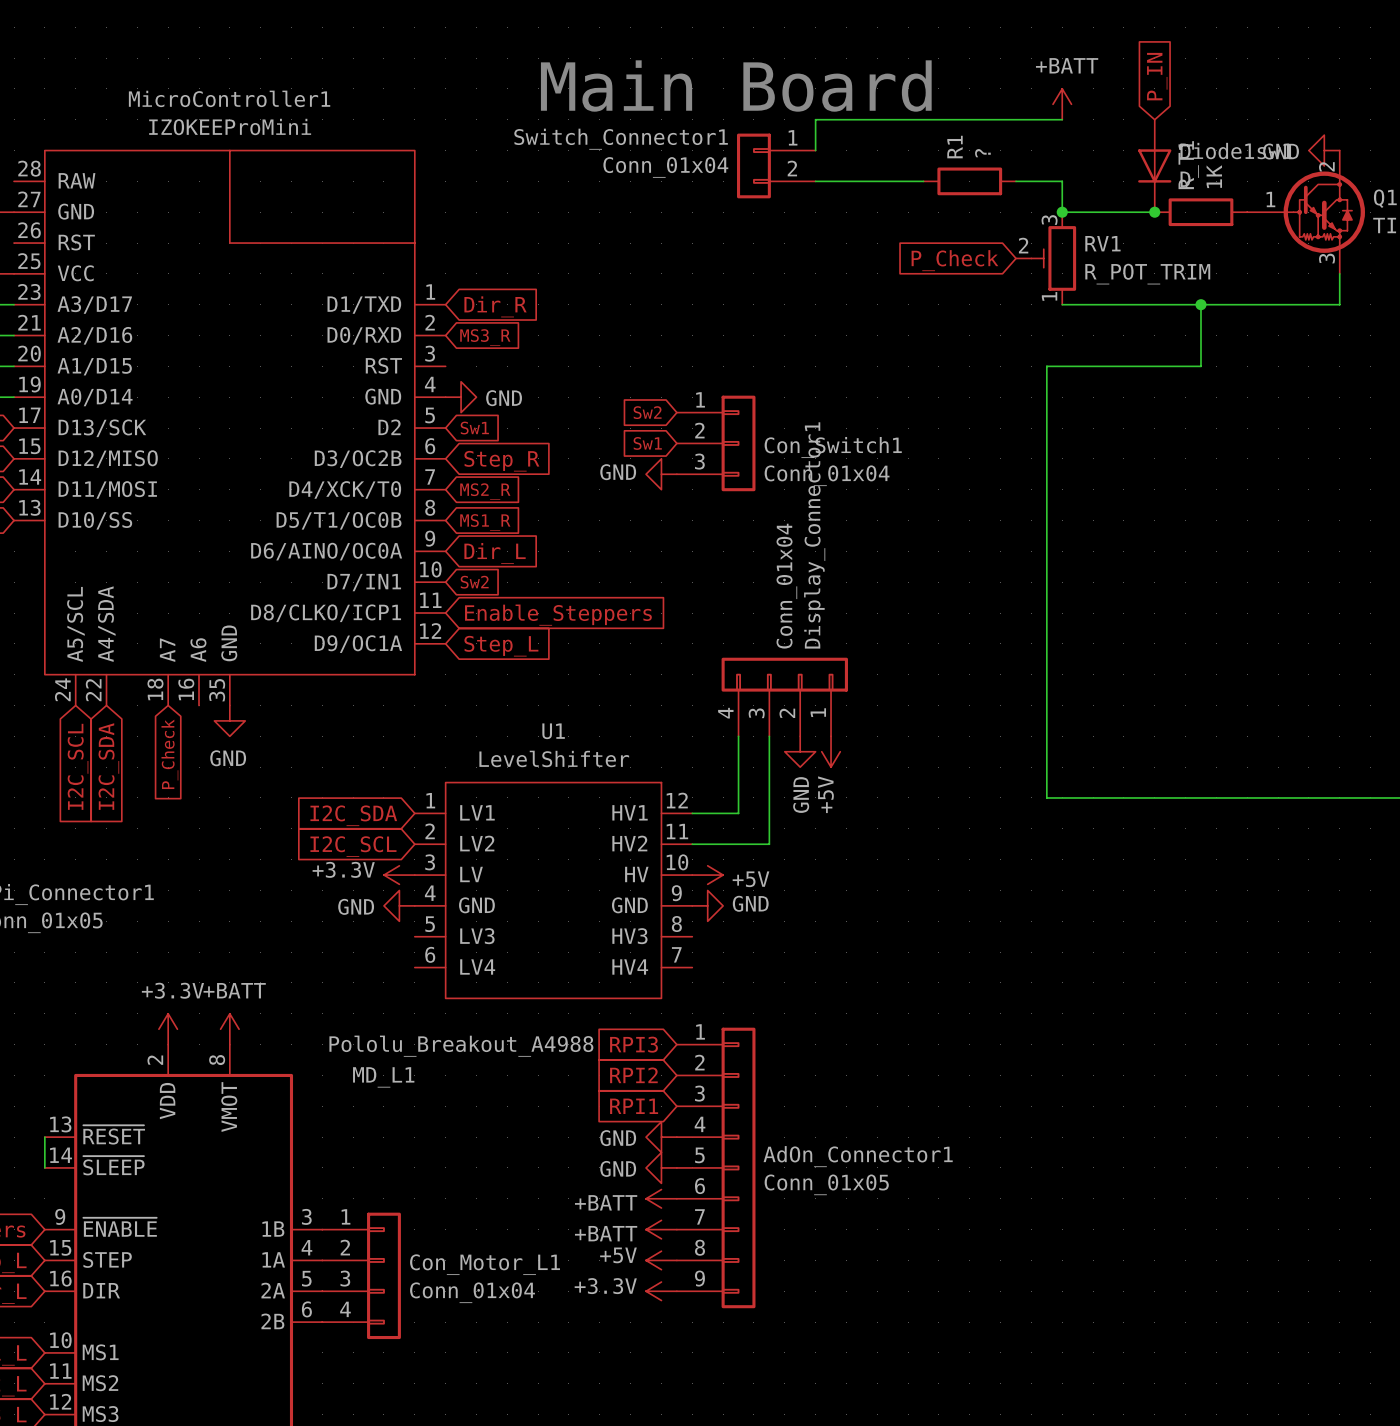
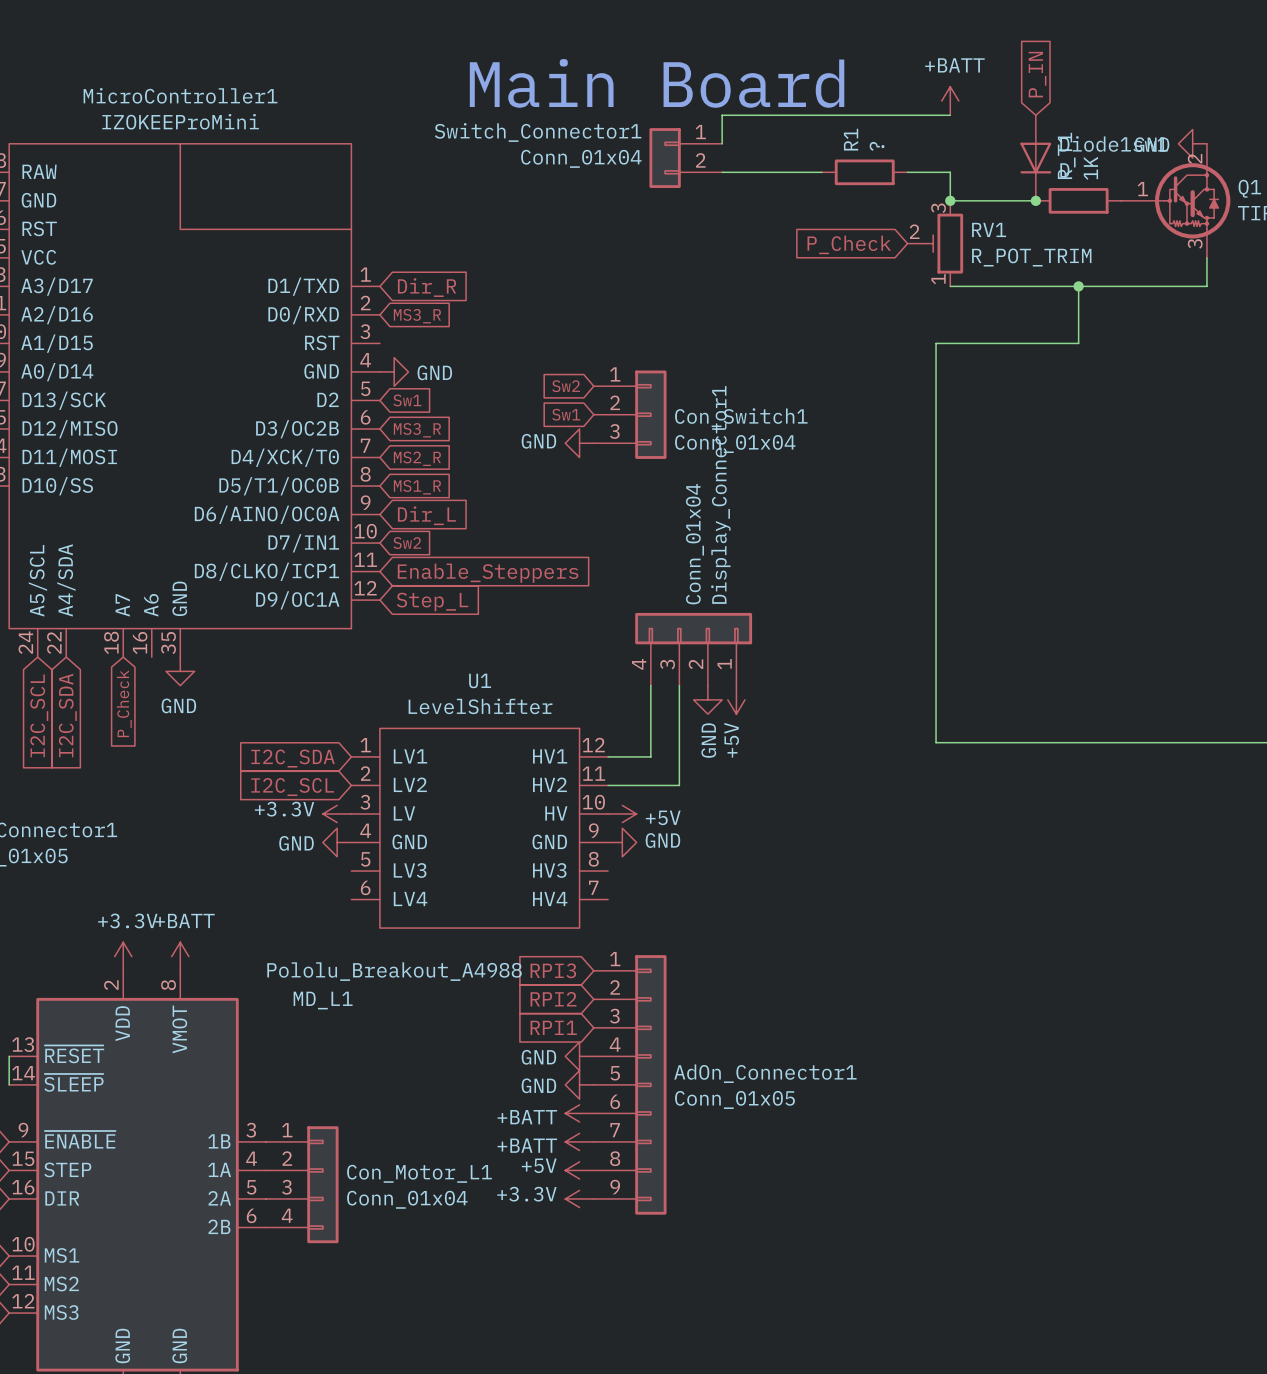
global label: Step_R (501, 461) -> MS3_R (417, 430)

